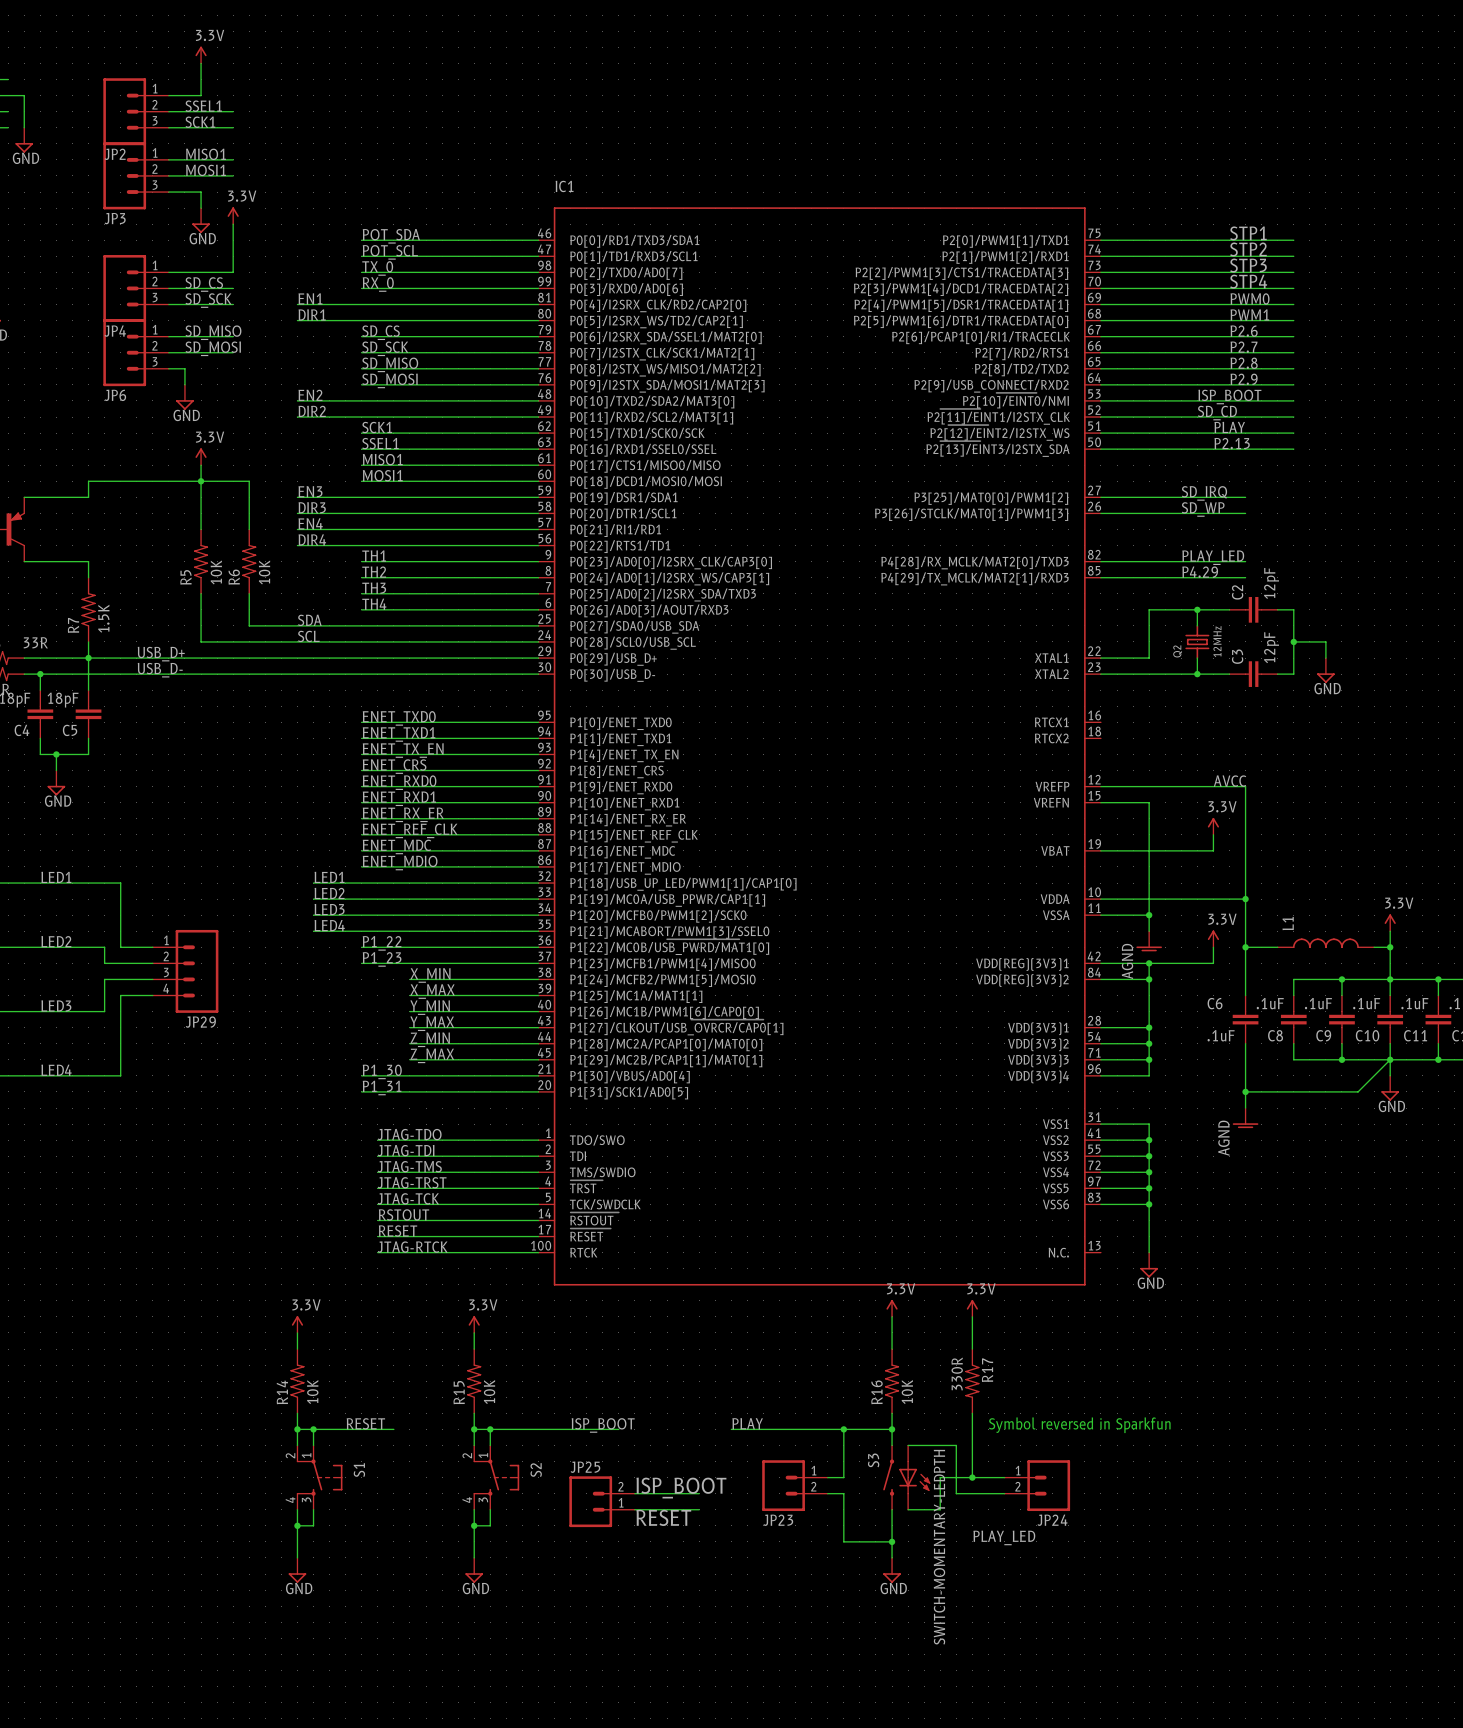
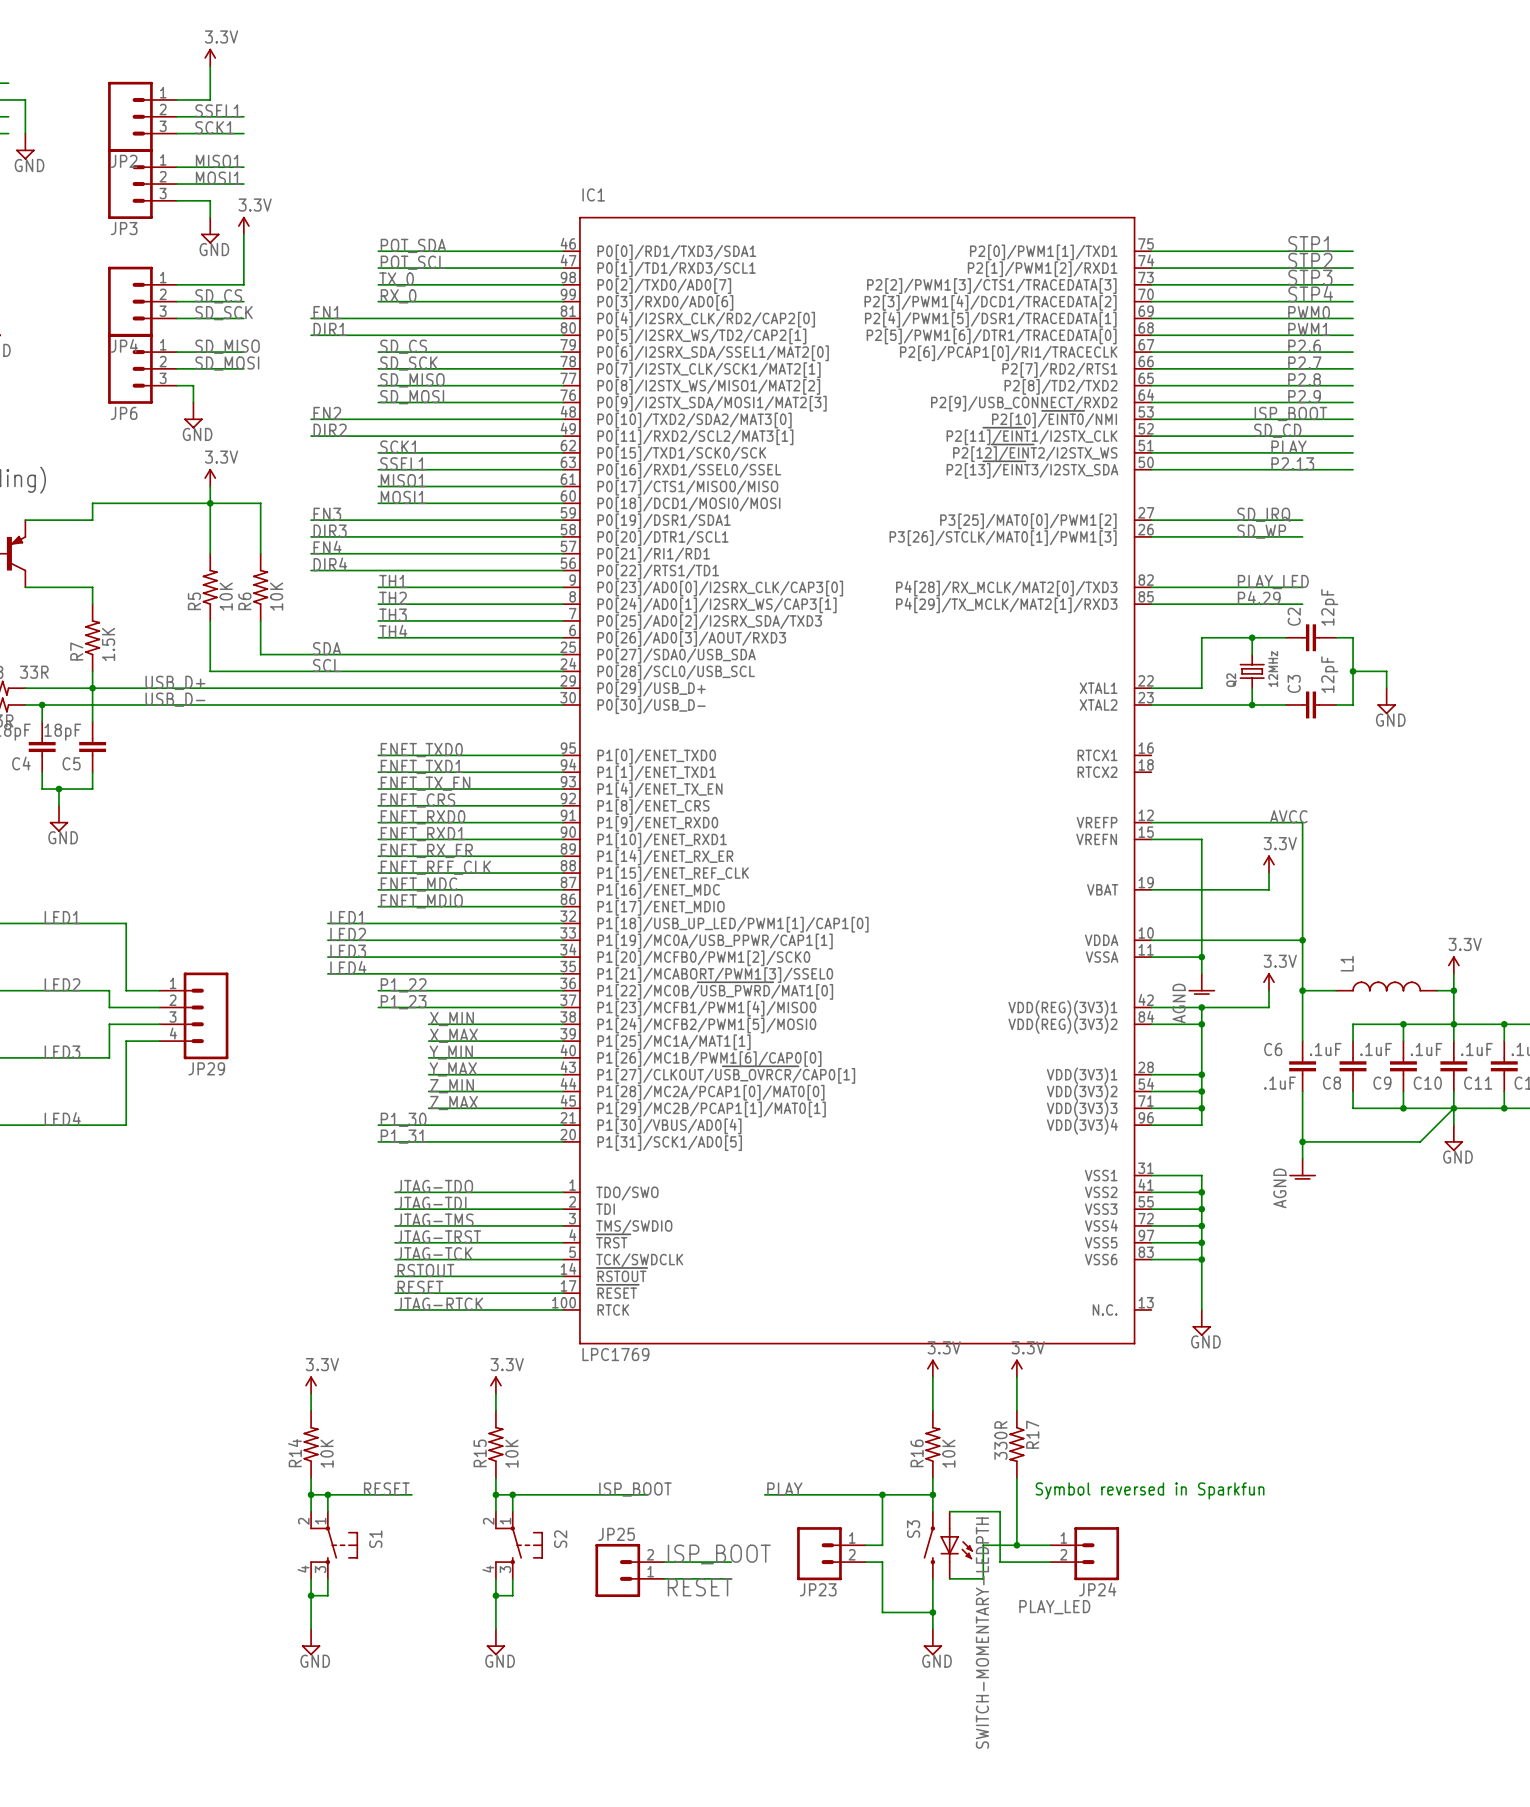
IC1 value: none -> LPC1769 (615, 1354)

